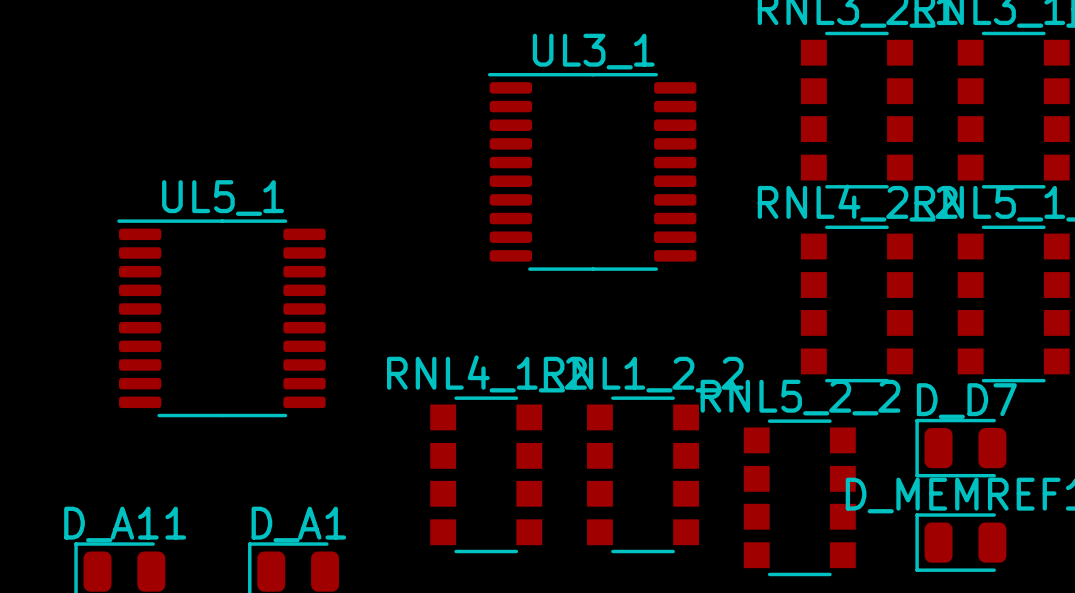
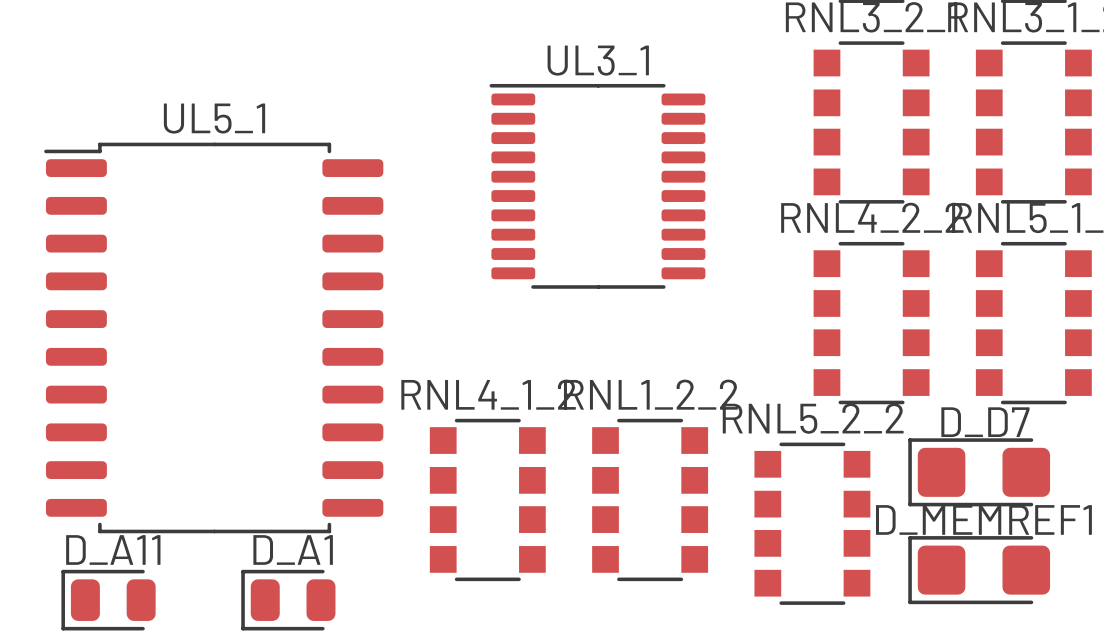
UL5_1 name position: UL5_1 (223, 198) -> UL5_1 (214, 118)
UL5_1 footprint: [117, 219, 326, 418] -> [44, 142, 384, 534]
D_D7 footprint: [915, 418, 1007, 478] -> [908, 438, 1051, 507]
D_MEMREF1 footprint: [915, 513, 1007, 572] -> [908, 536, 1051, 605]

